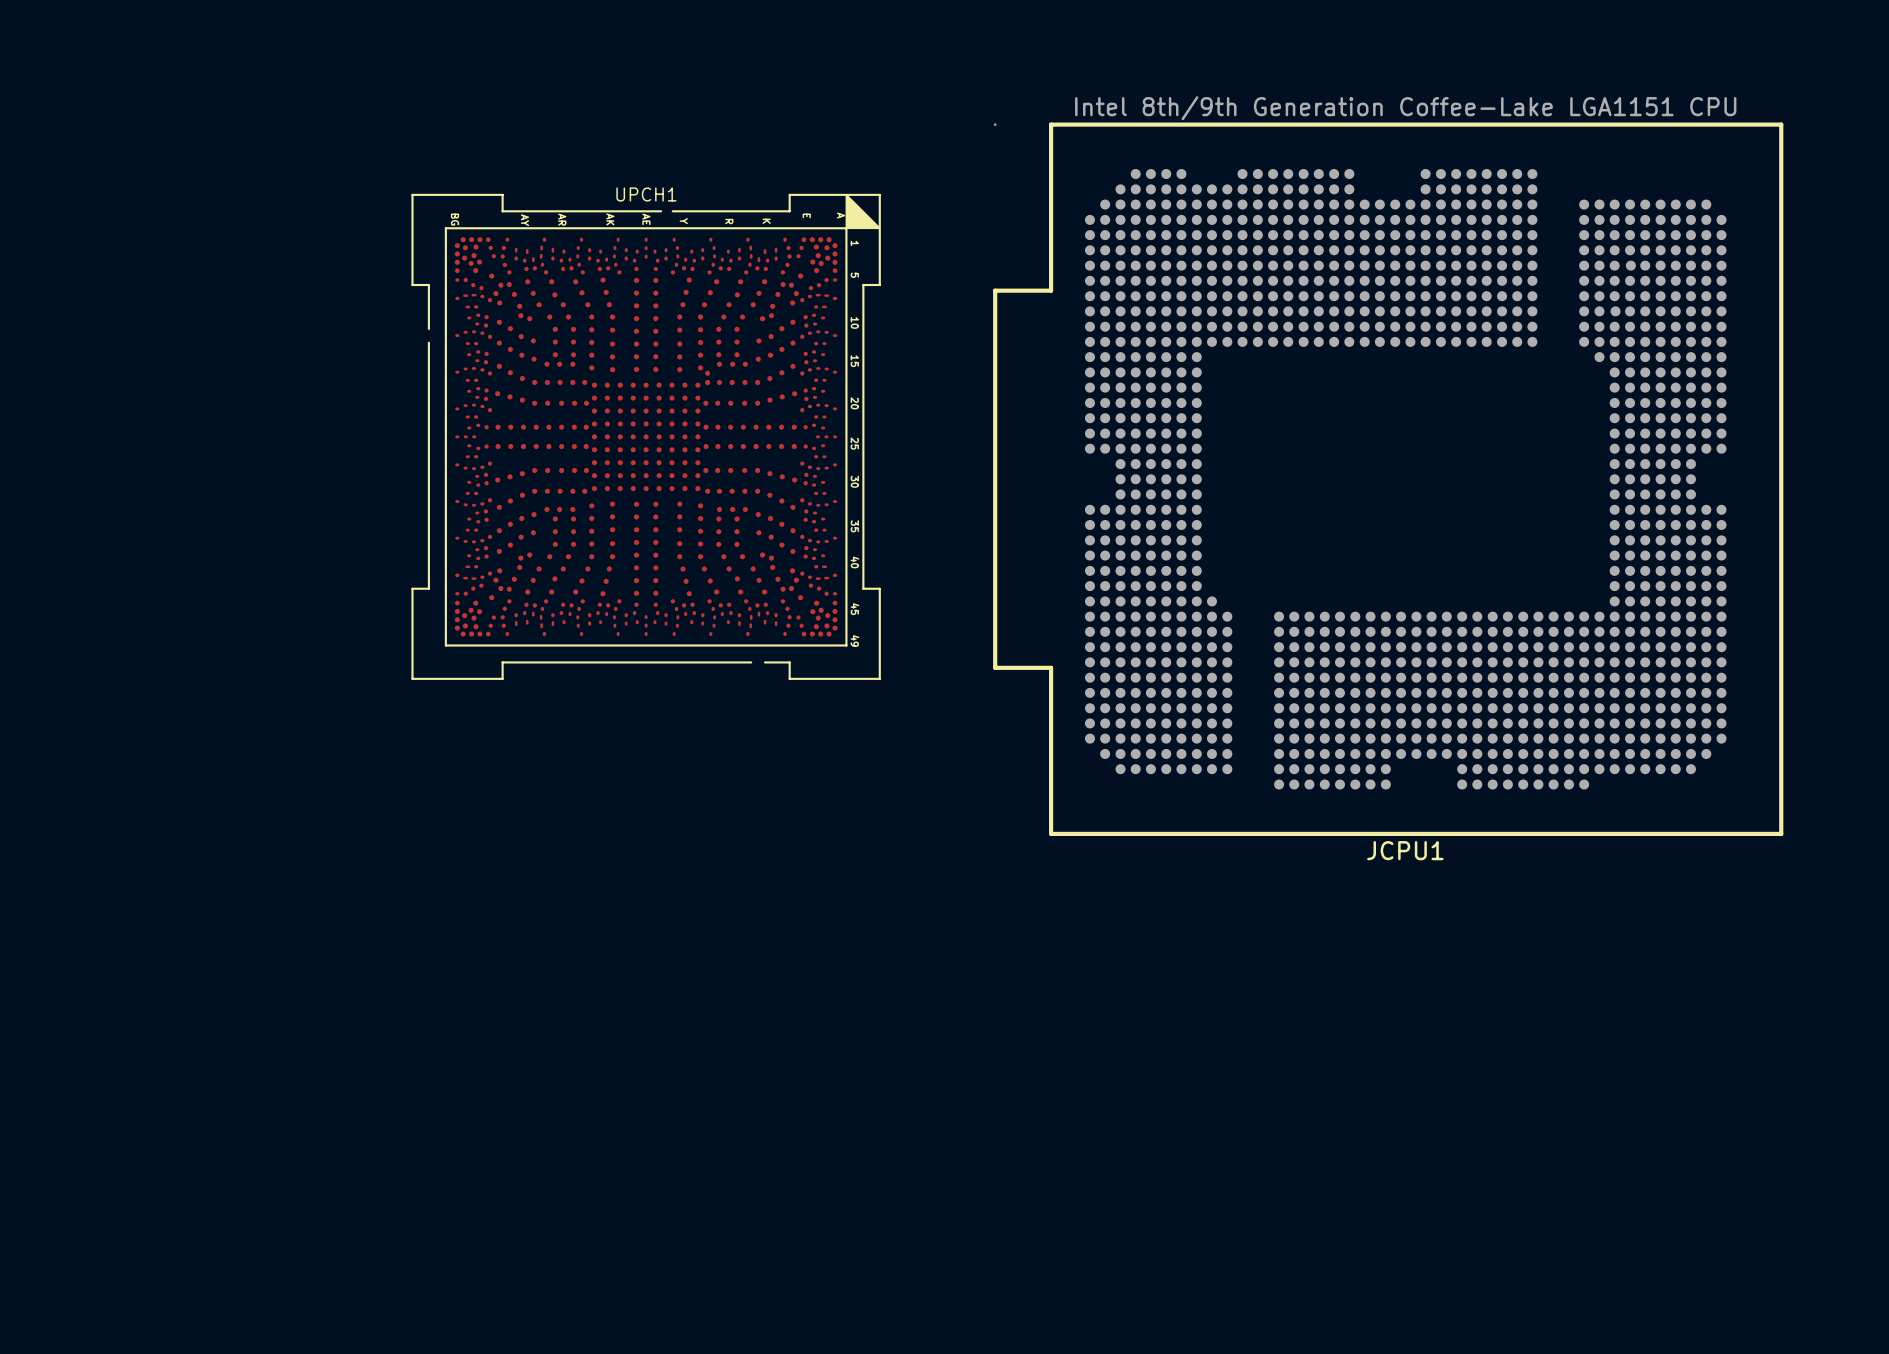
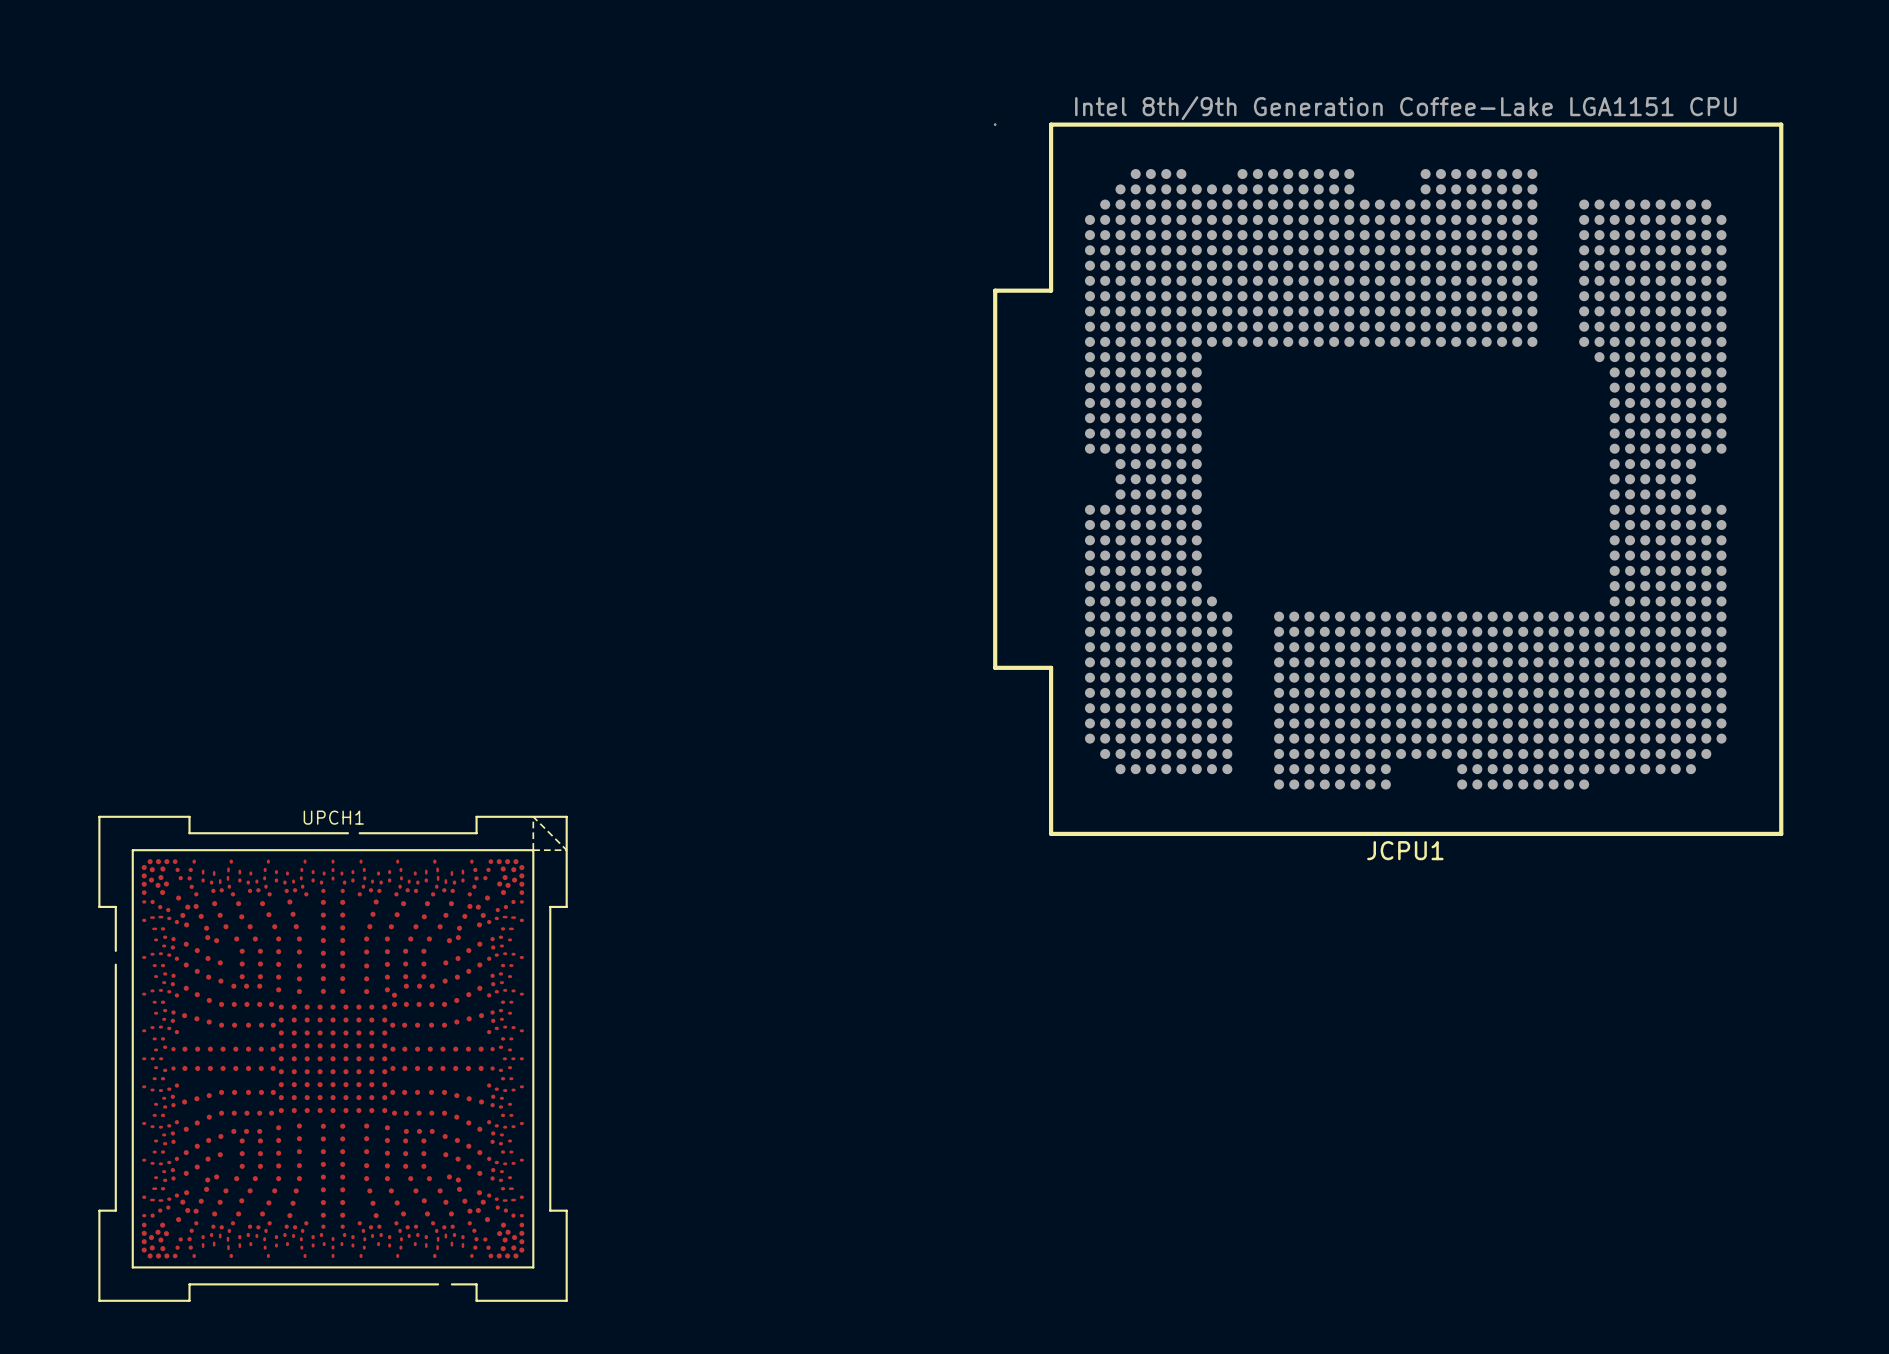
UPCH1 footprint: [411, 193, 881, 680] -> [98, 815, 568, 1302]

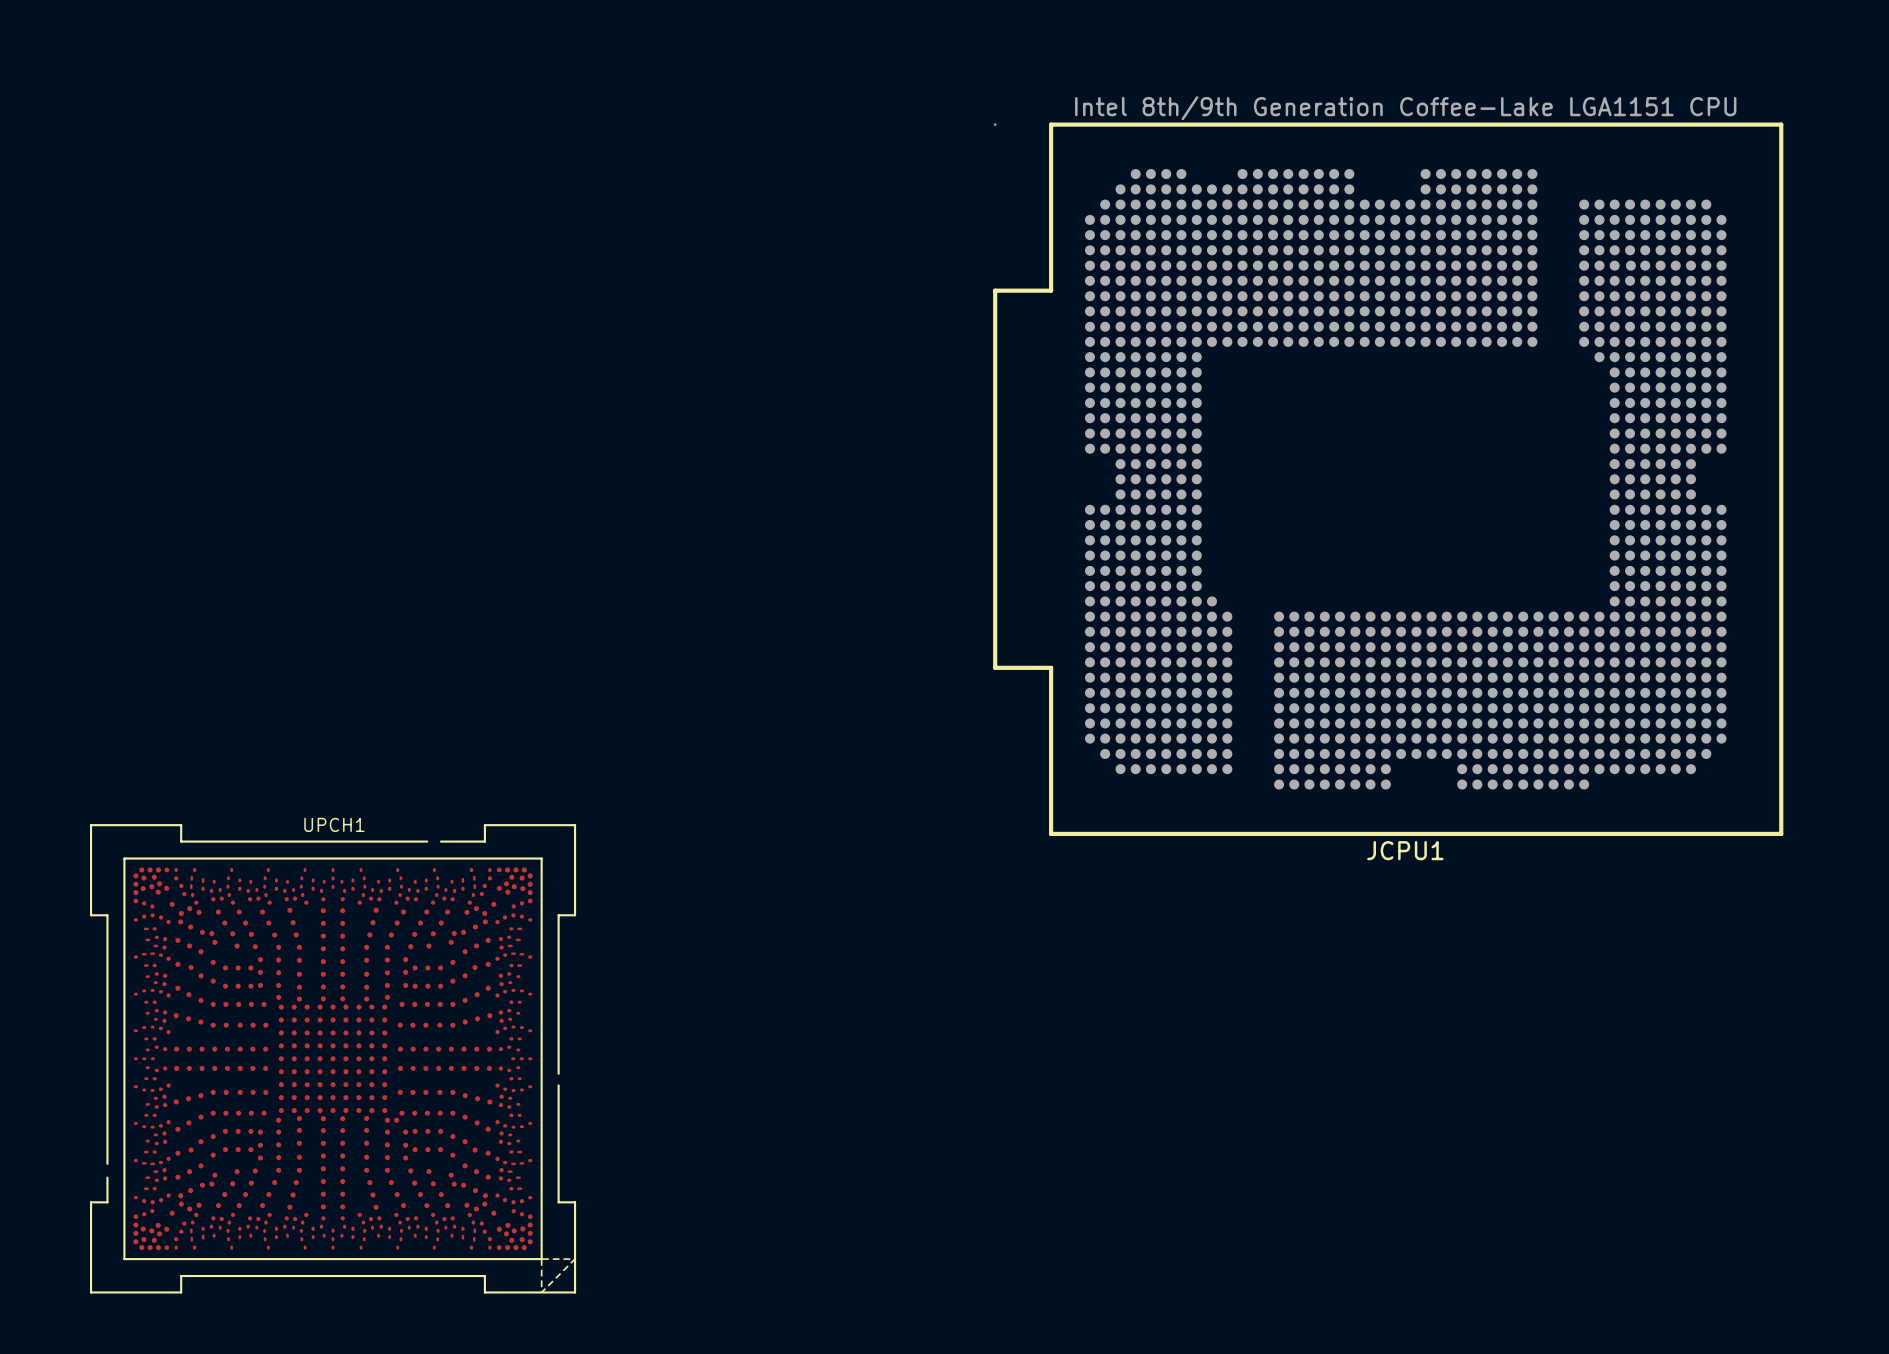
UPCH1 footprint: [98, 815, 568, 1302] -> [89, 824, 577, 1294]

